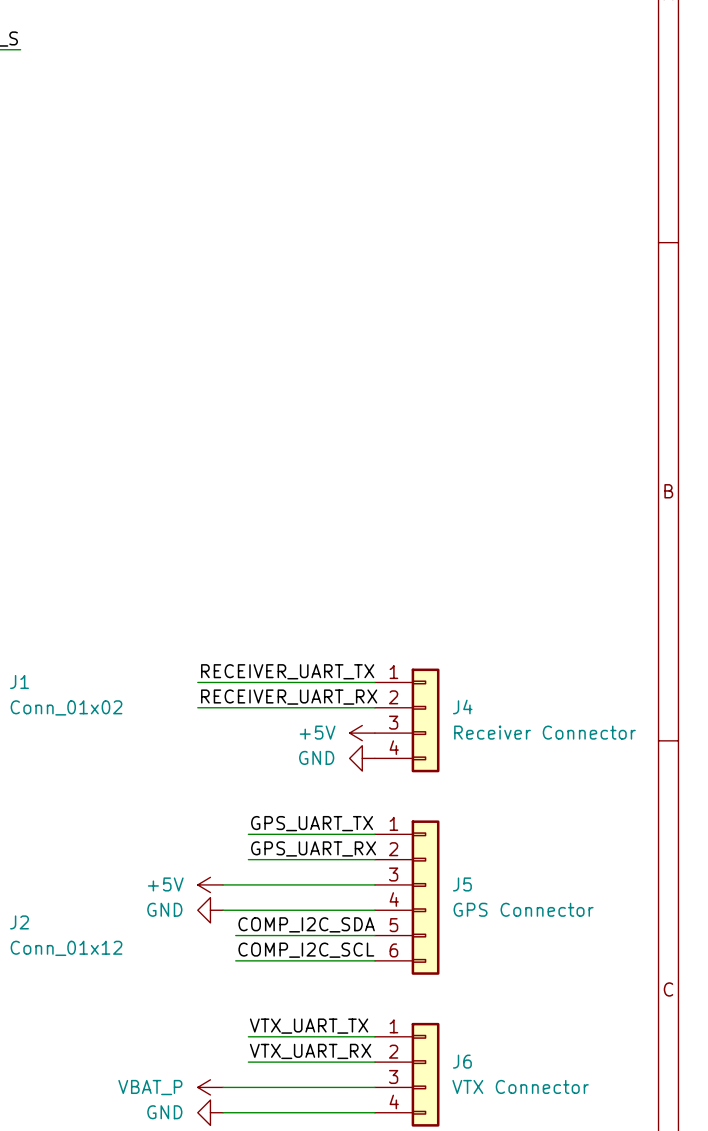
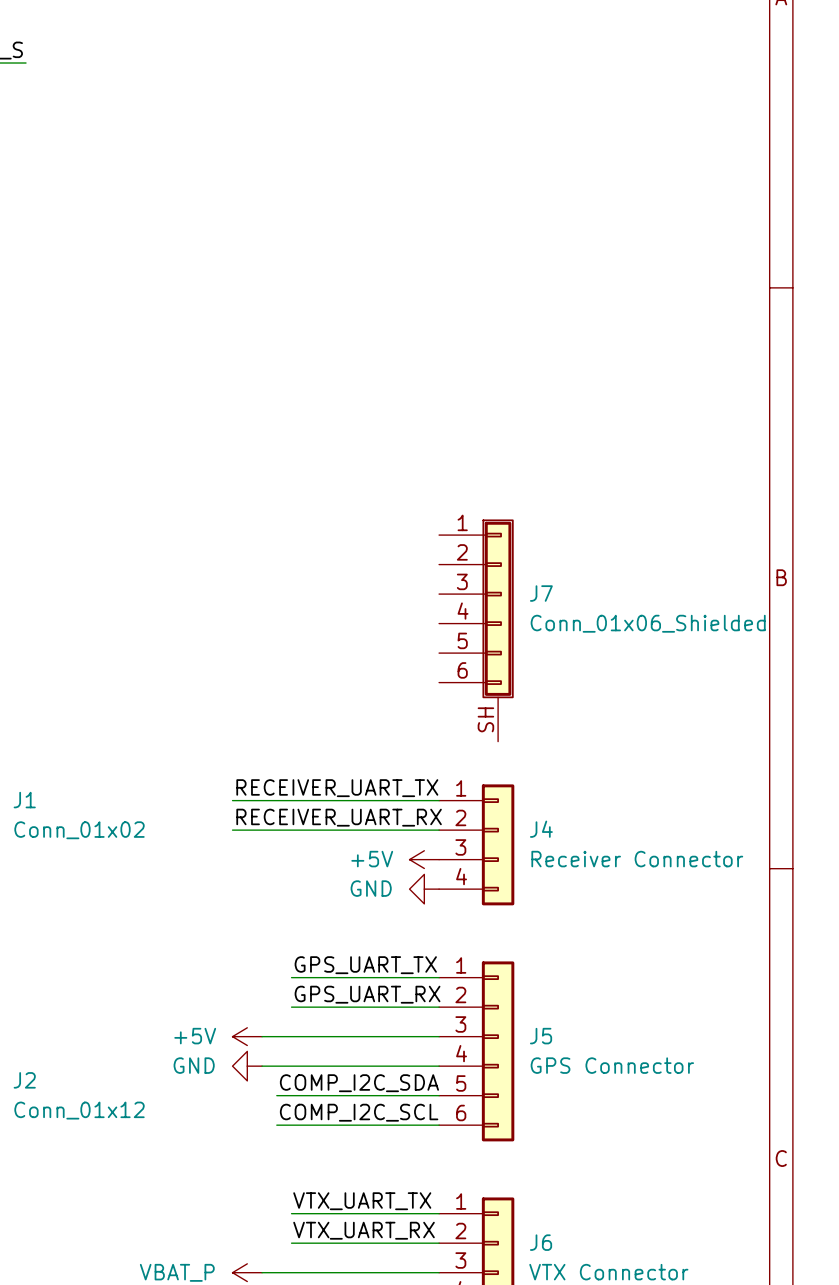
J7: none -> Conn_01x06_Shielded (476, 630)

